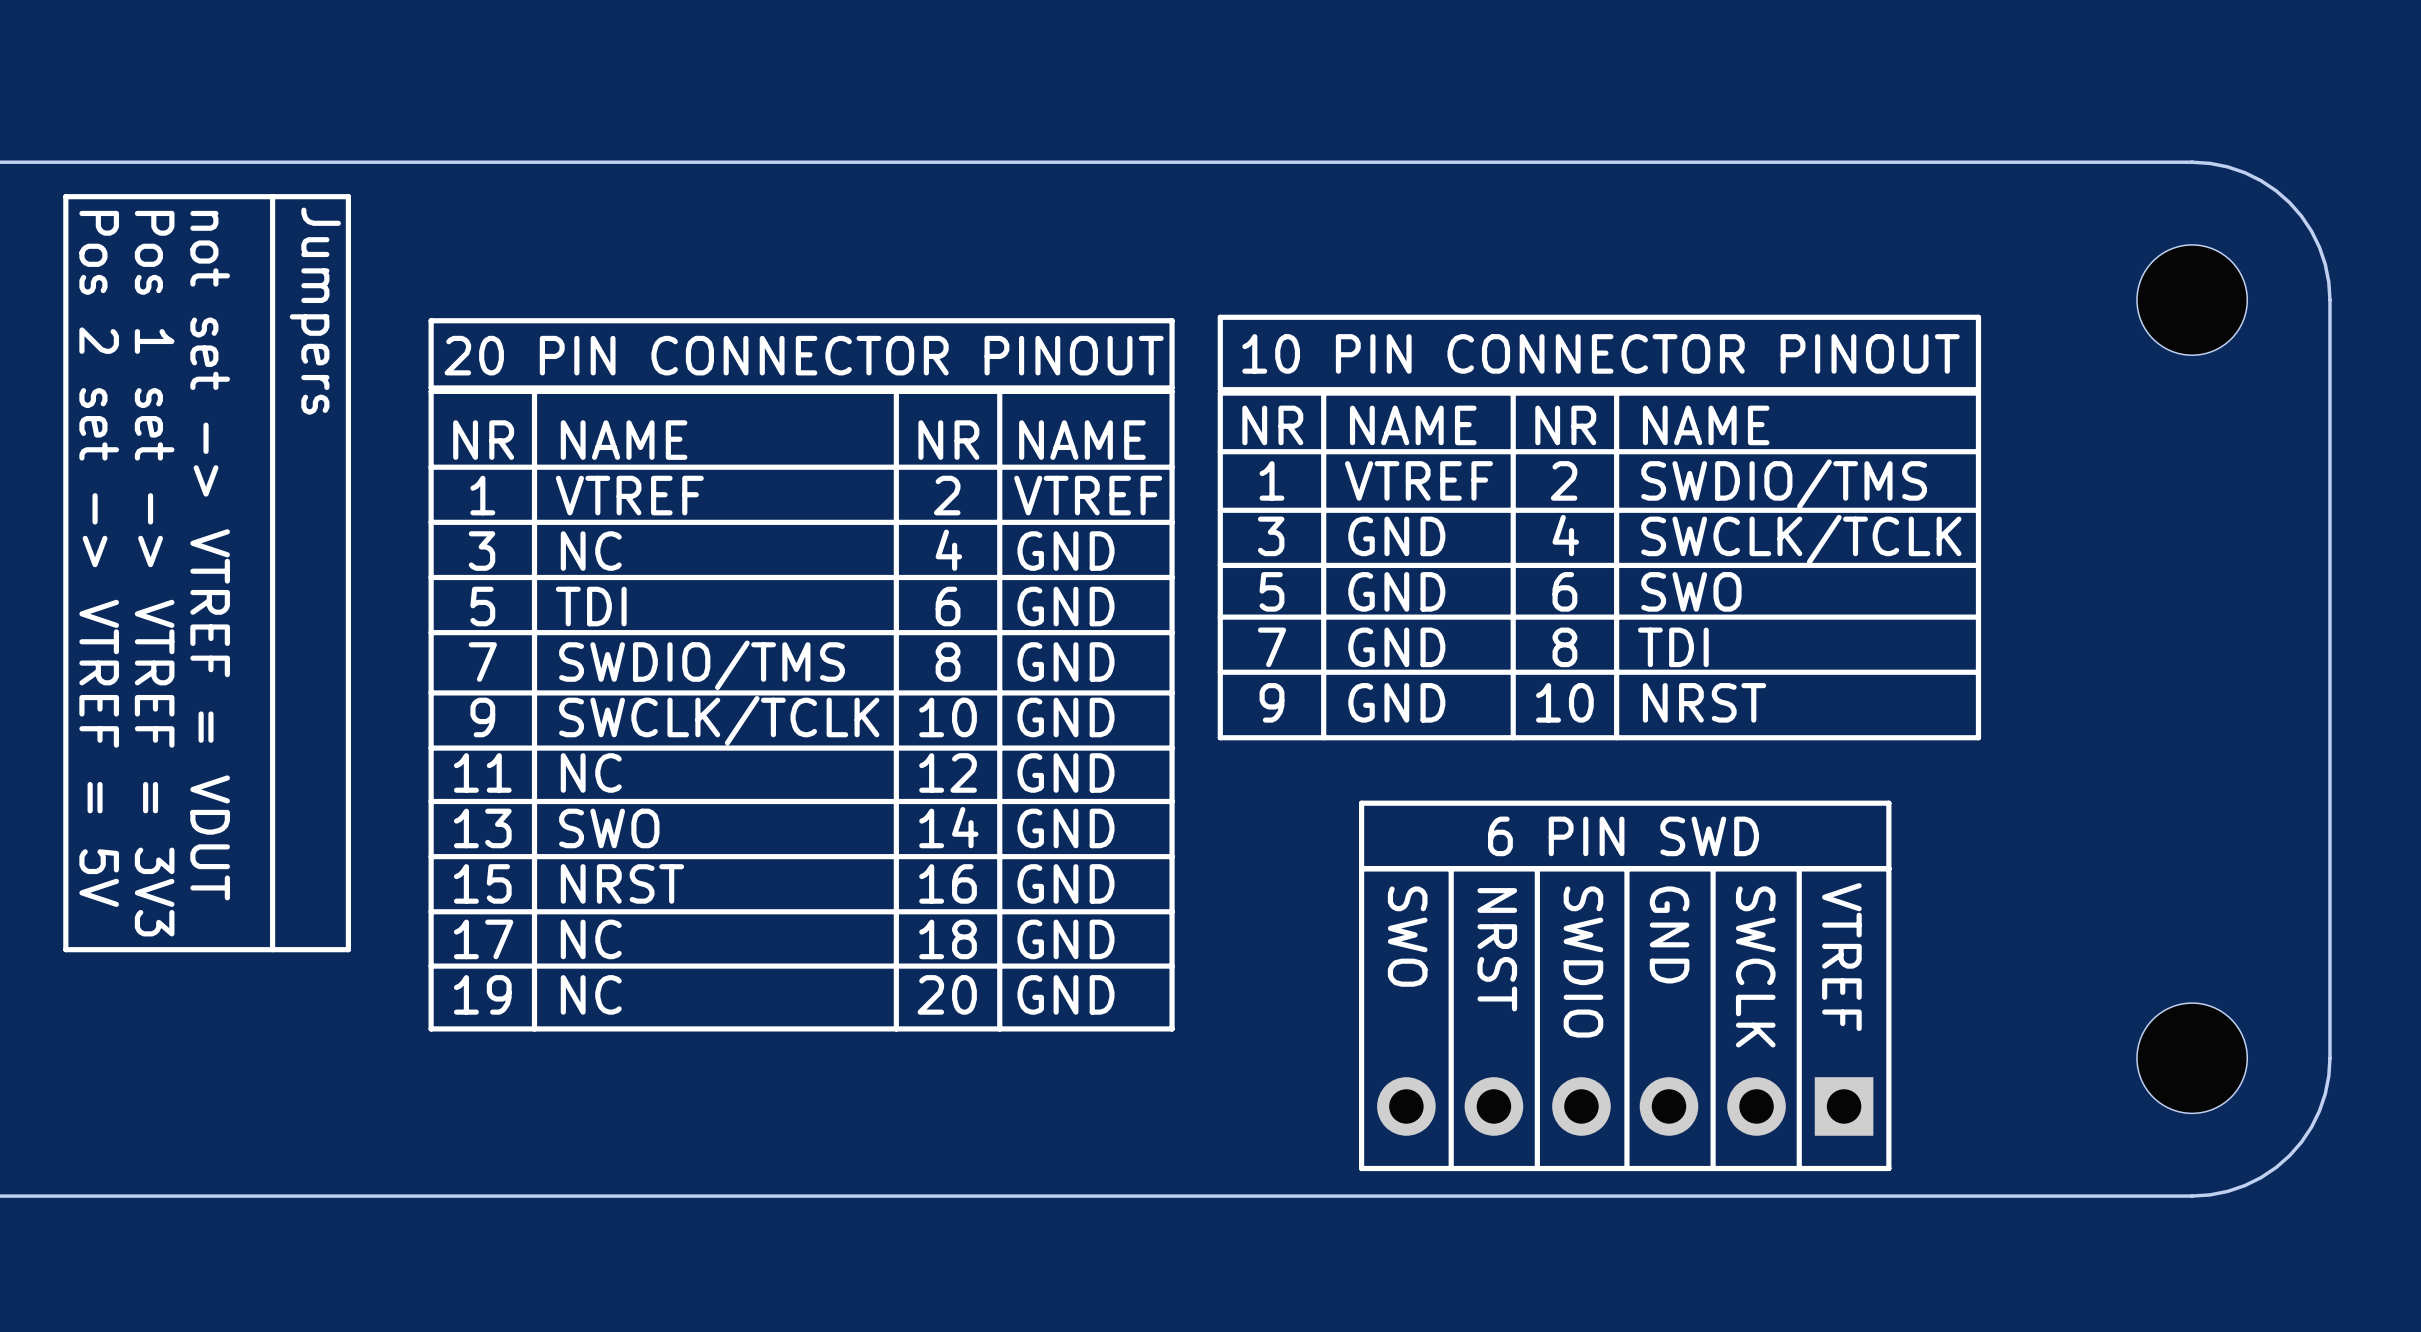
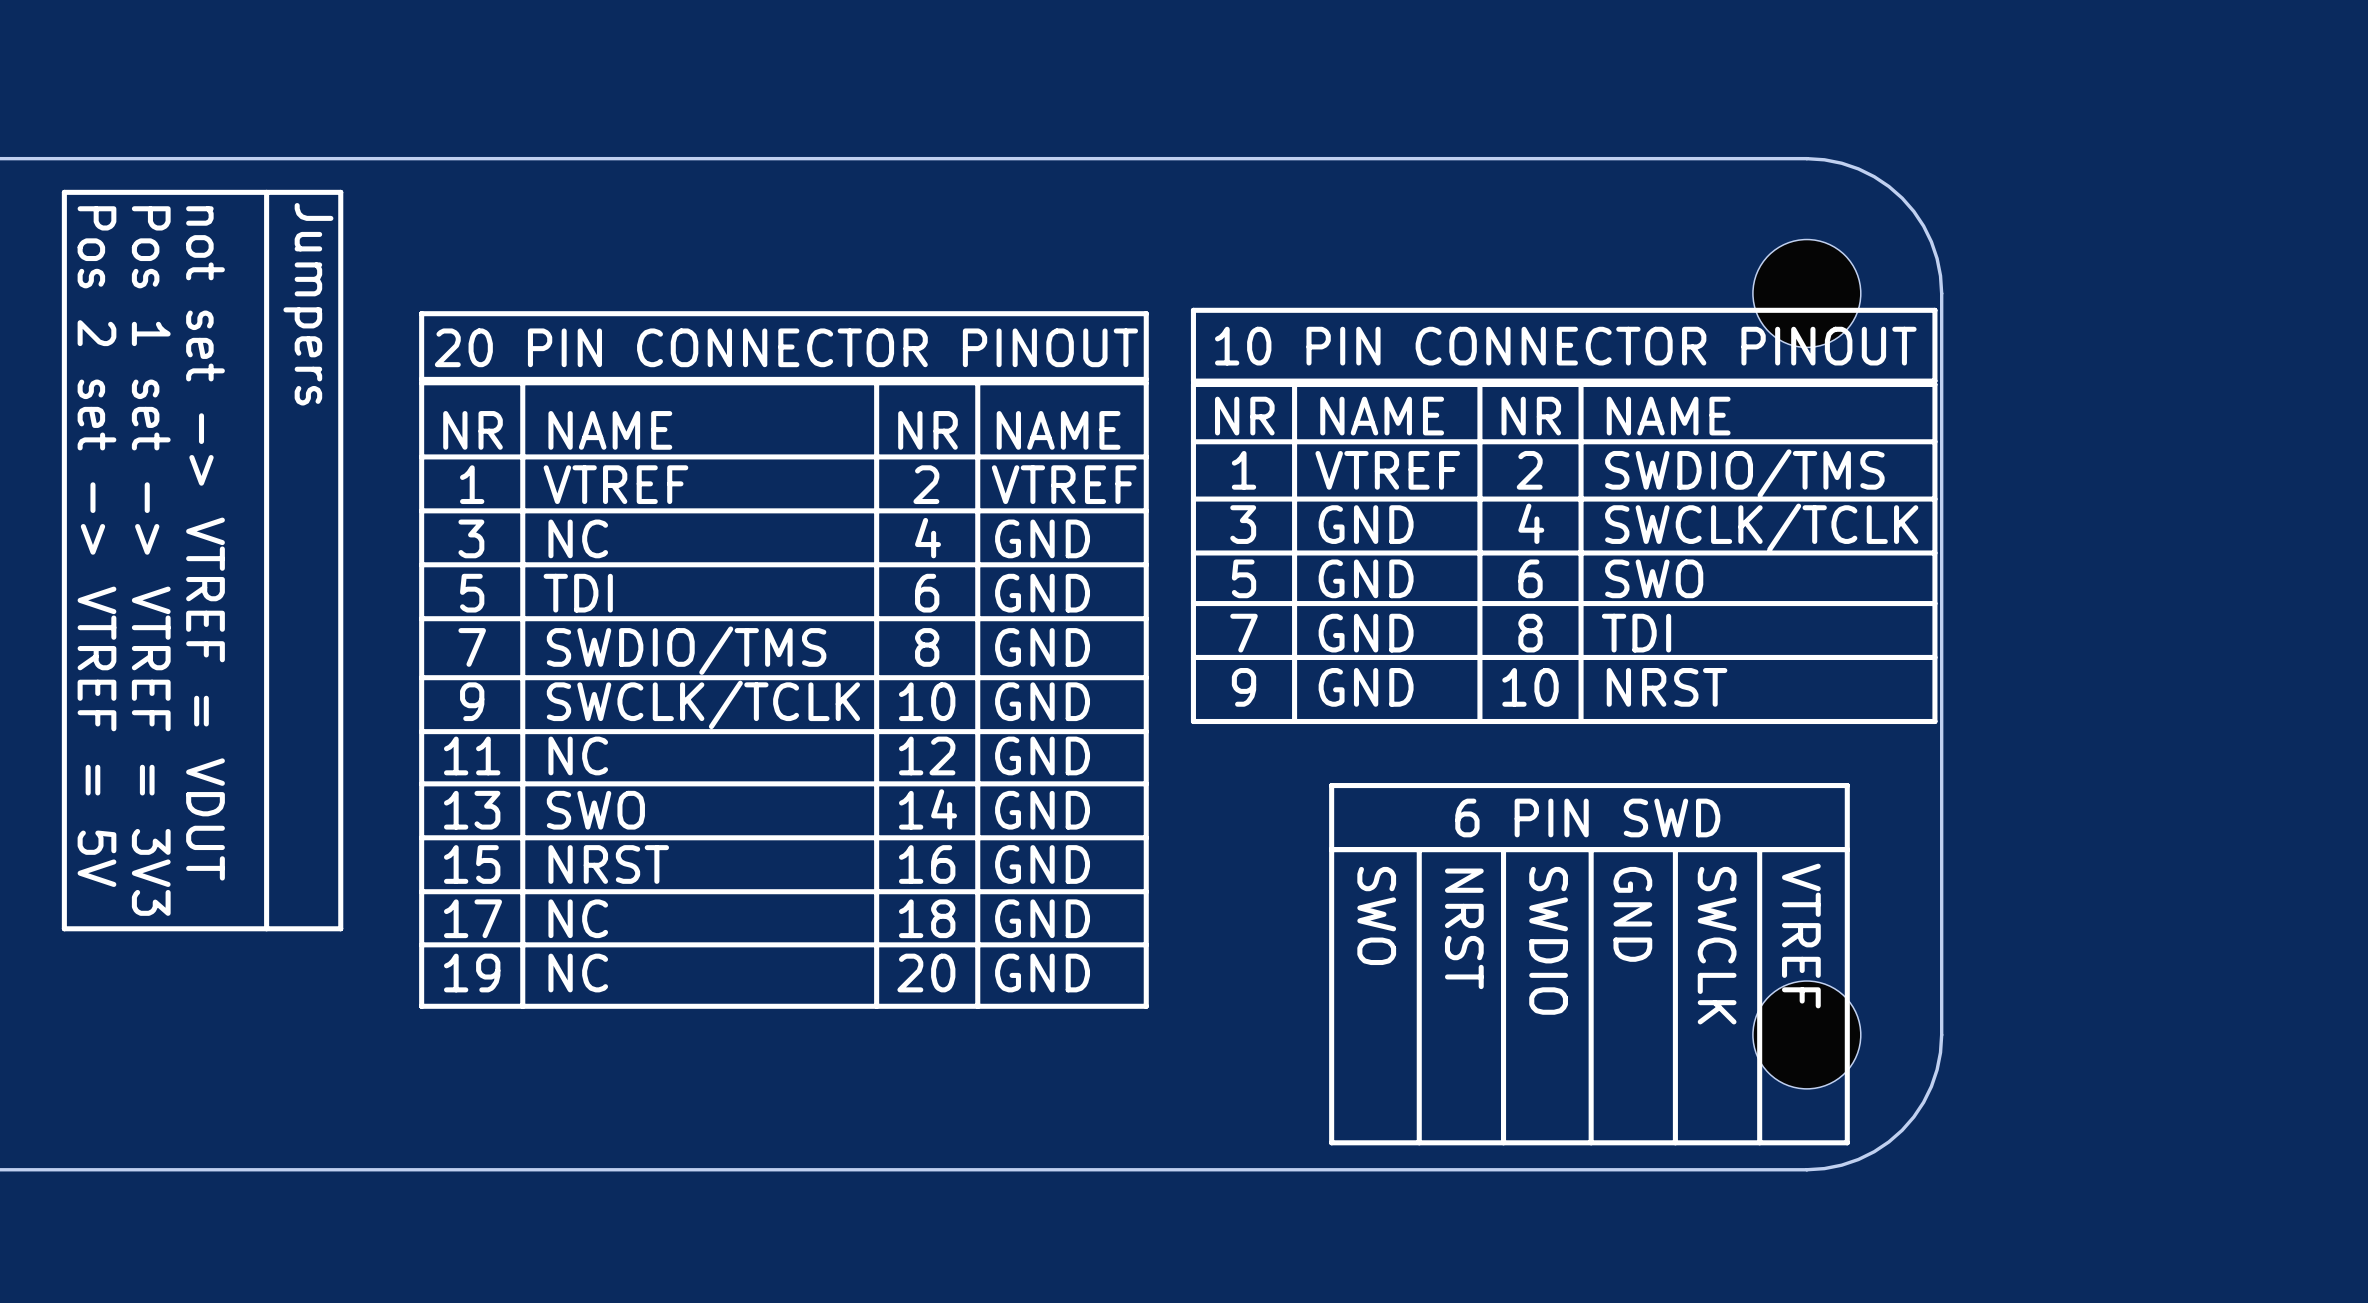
board edge: (1847, 162) (2192, 162) (2227, 166) (2261, 180) (2276, 190) (2301, 216) (2311, 231) (2325, 264) (2329, 300) (2329, 1058) (2325, 1093) (2311, 1127) (2301, 1142) (2276, 1167) (2244, 1185) (2210, 1194) (1847, 1196) -> (1806, 158) (1824, 159) (1858, 168) (1888, 186) (1902, 198) (1913, 211) (1931, 241) (1940, 275) (1941, 293) (1940, 1052) (1937, 1069) (1923, 1102) (1902, 1130) (1888, 1141) (1858, 1159) (1824, 1168) (1806, 1169)
part position: (2192, 300) -> (1806, 293)
part position: (2192, 1058) -> (1806, 1034)
part: (1625, 1106) -> none

